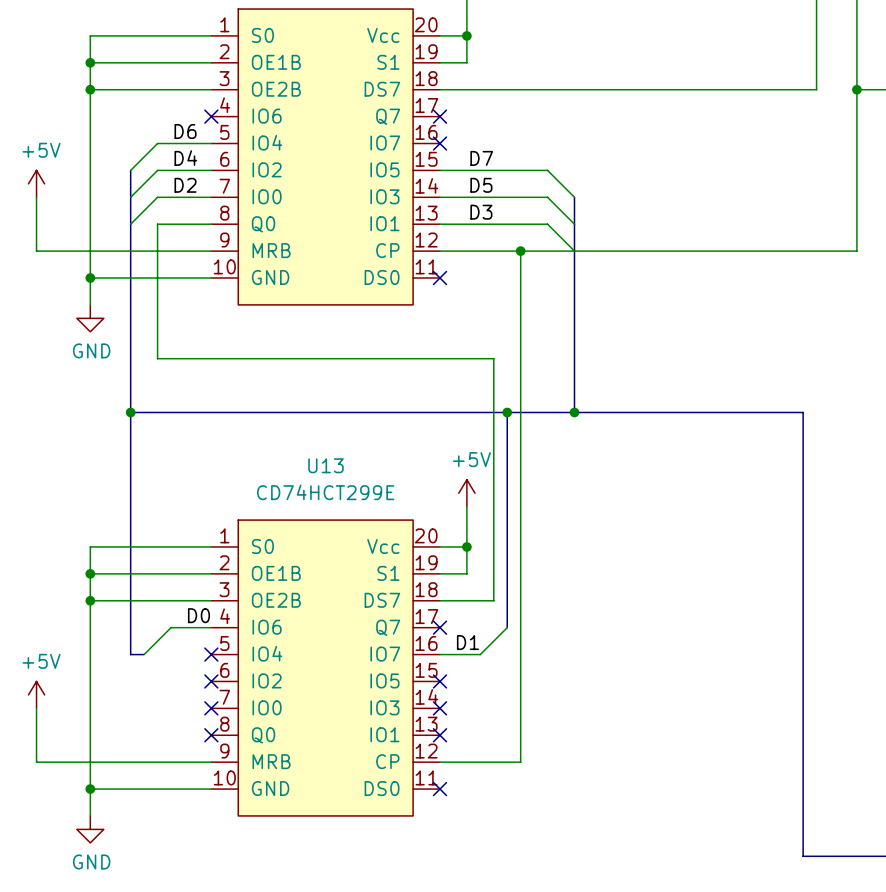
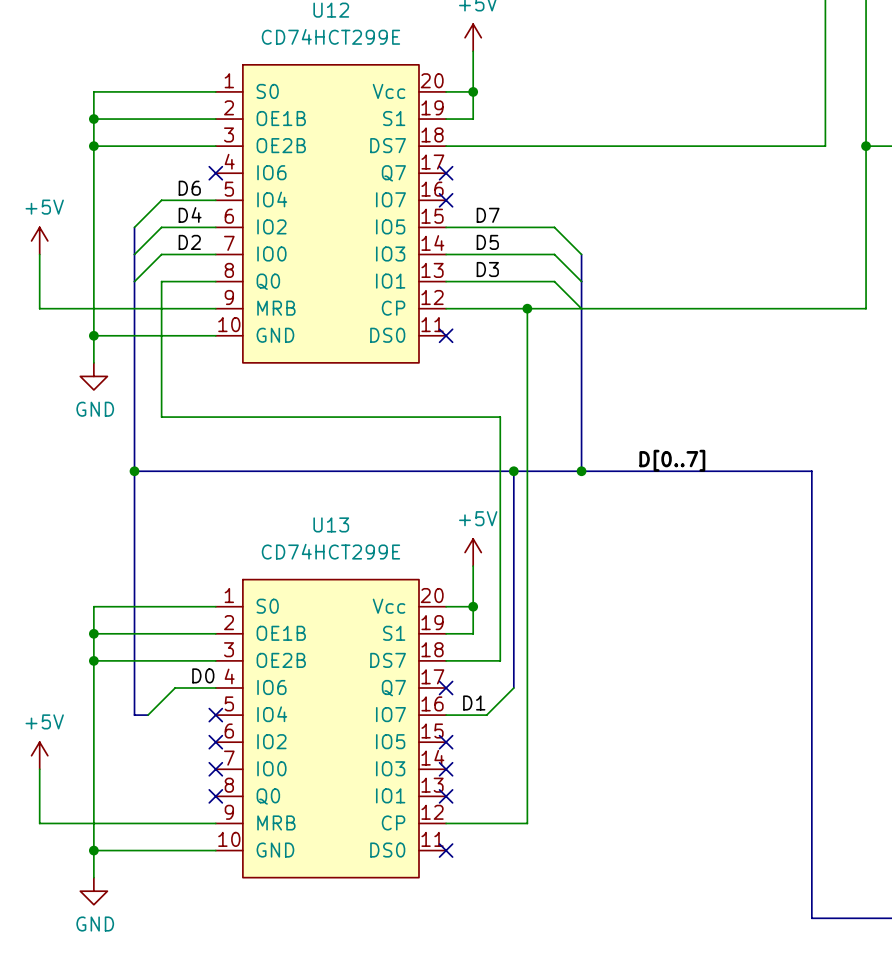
label: none -> D[0..7] (672, 460)

